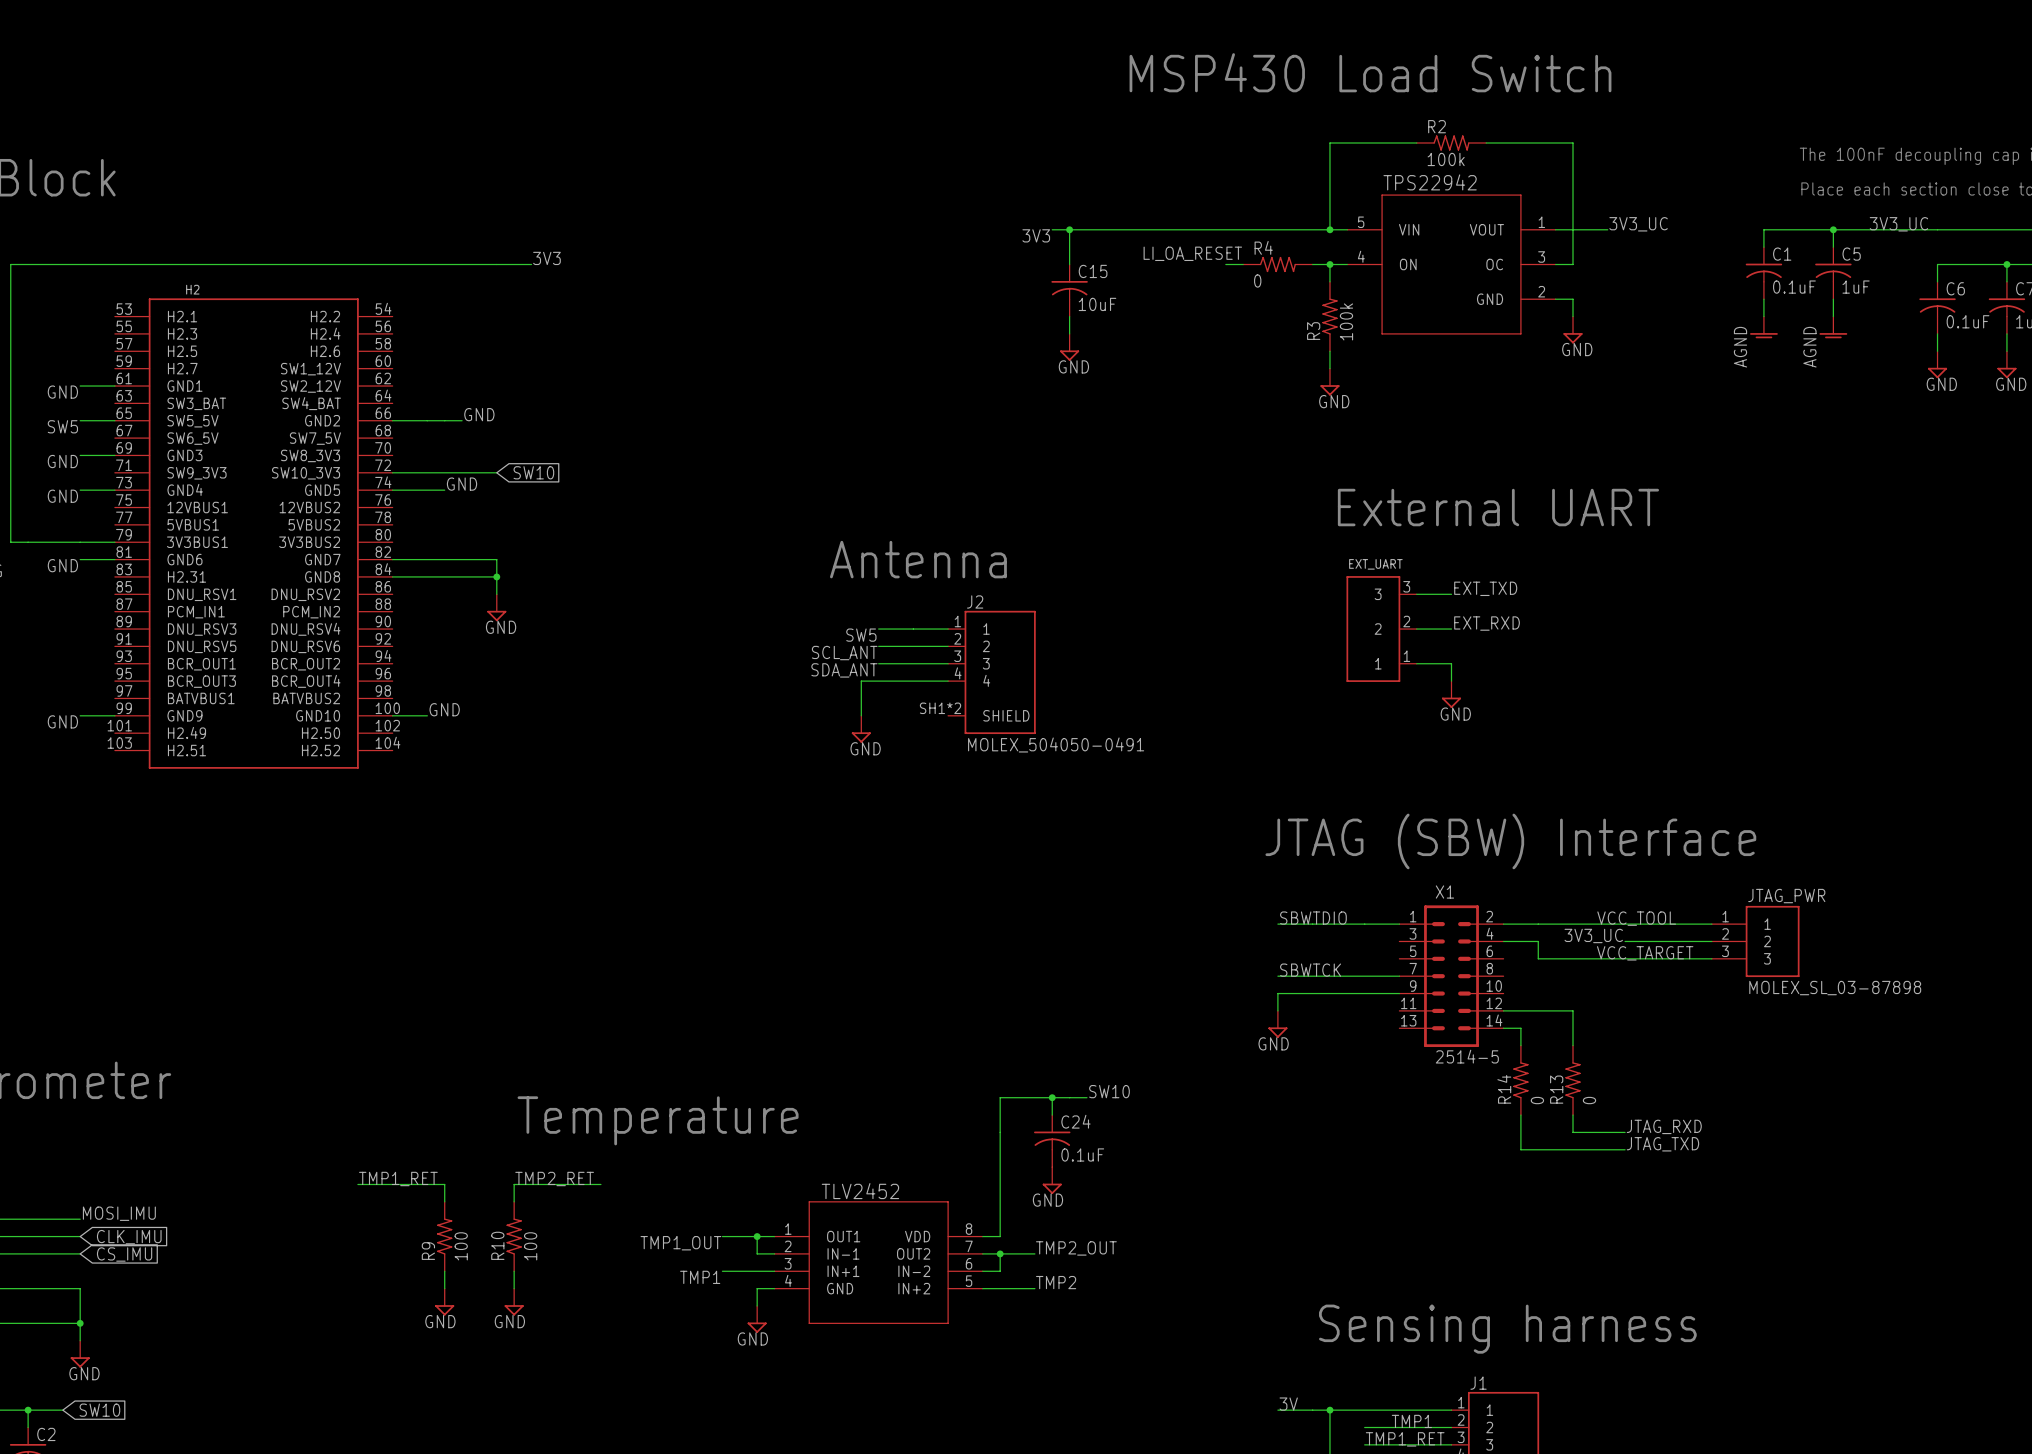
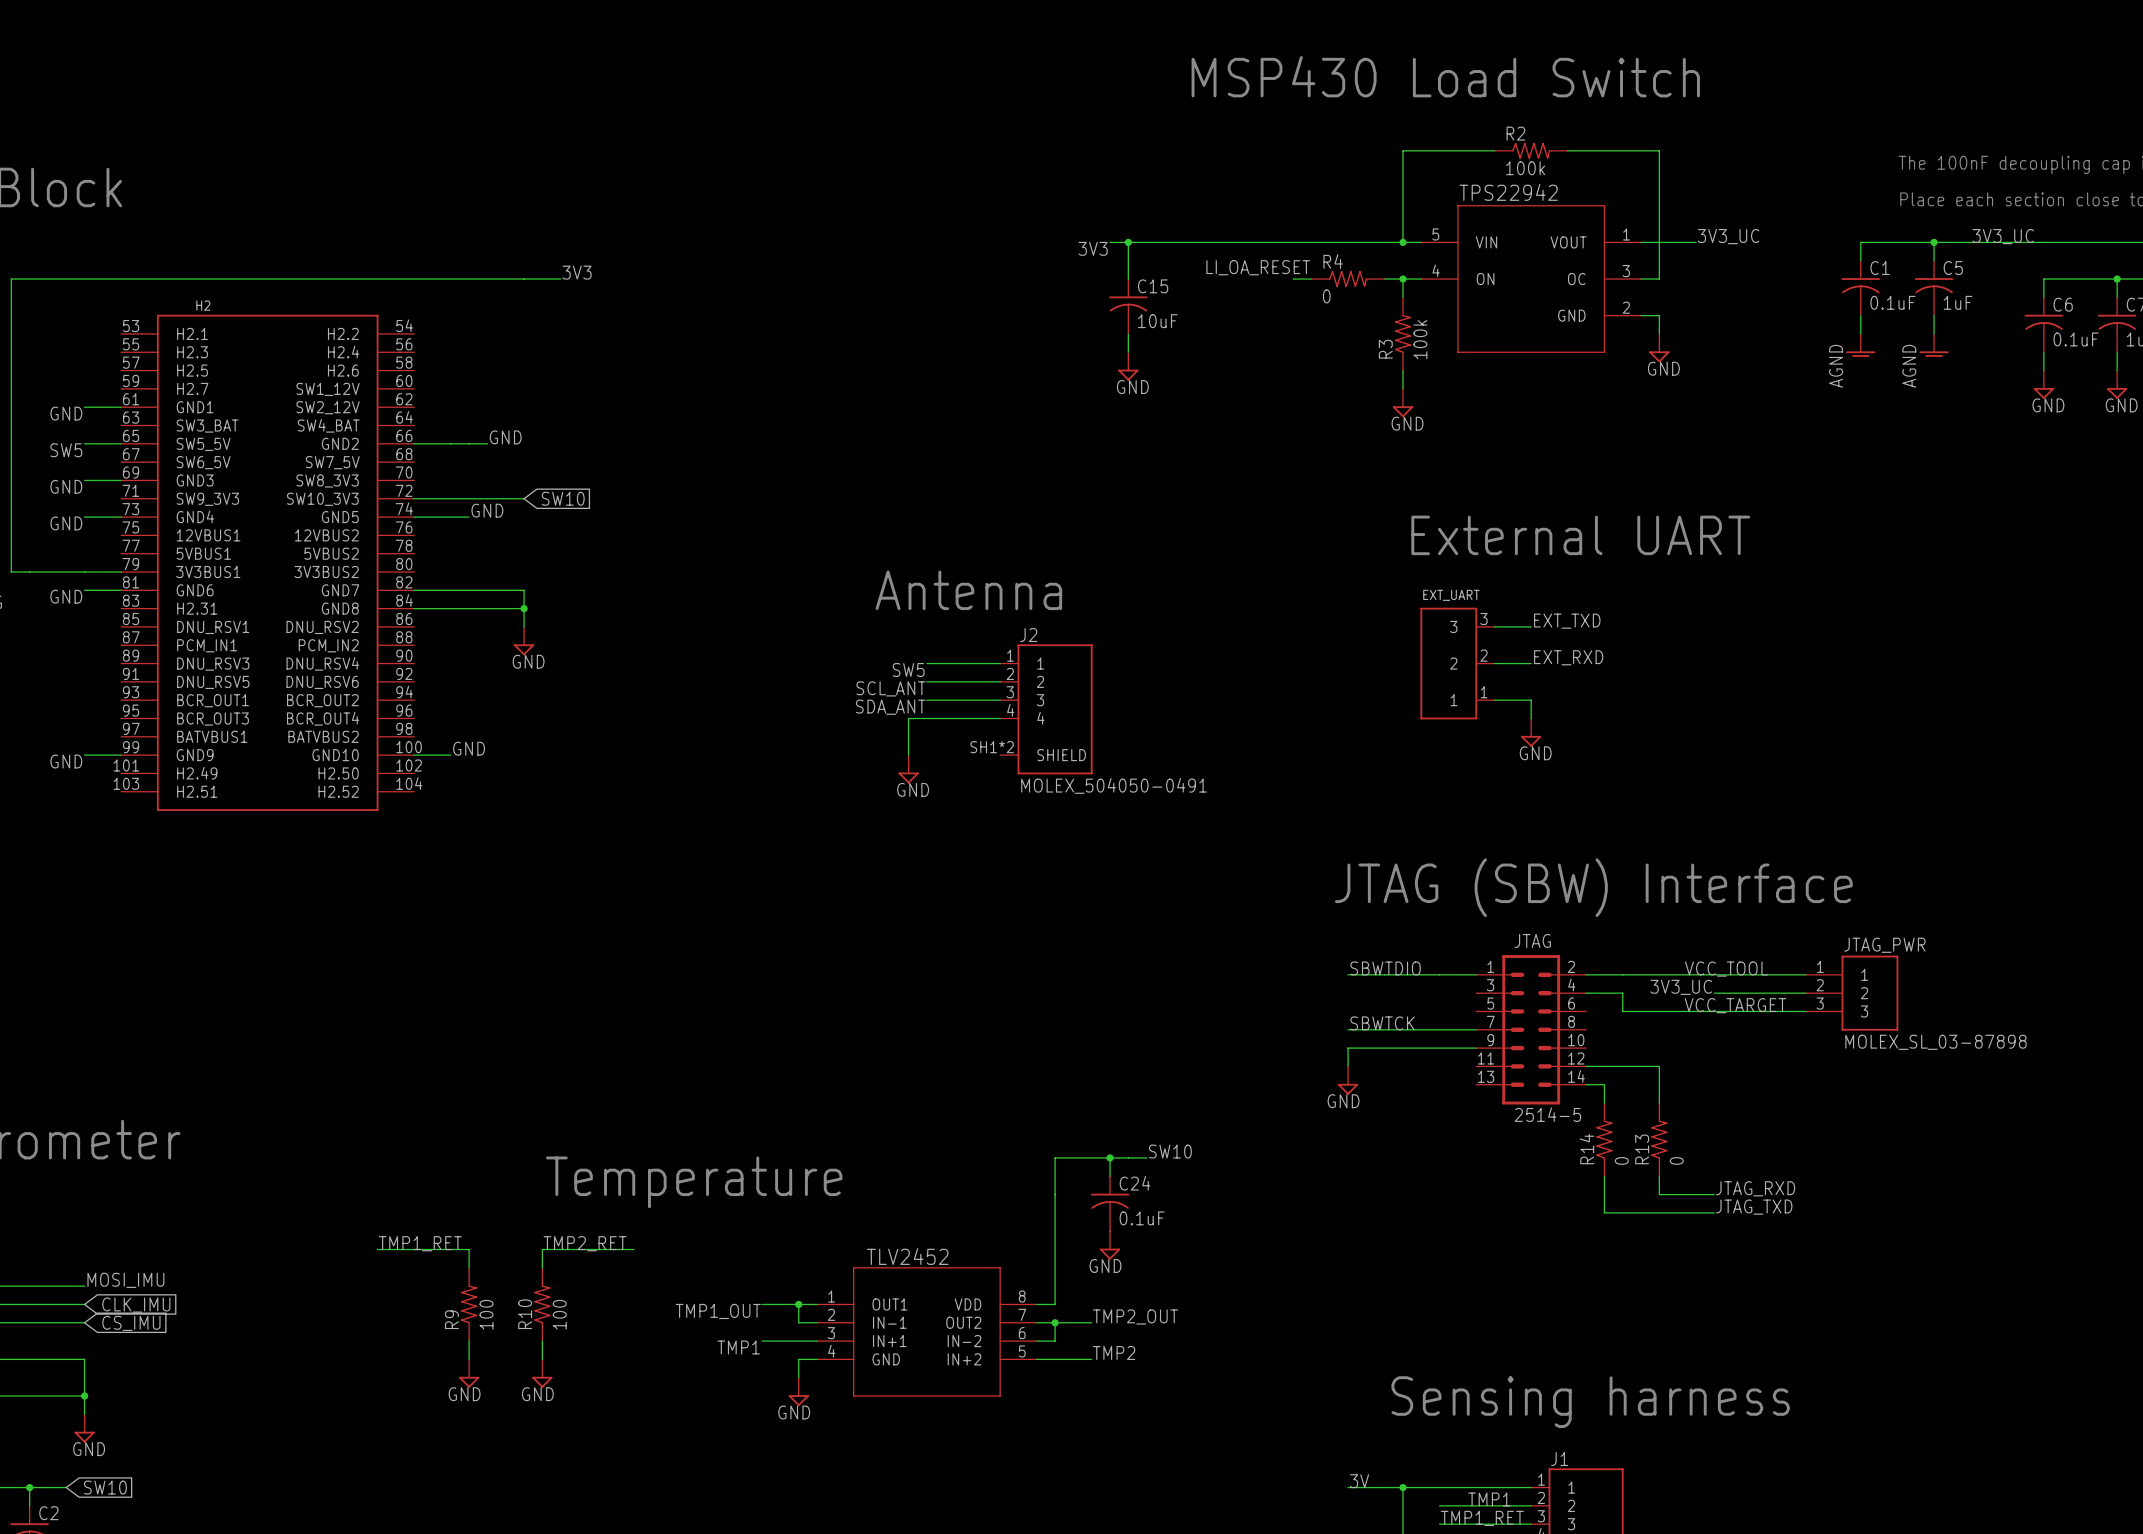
X1 name: X1 (1444, 892) -> JTAG (1532, 940)

